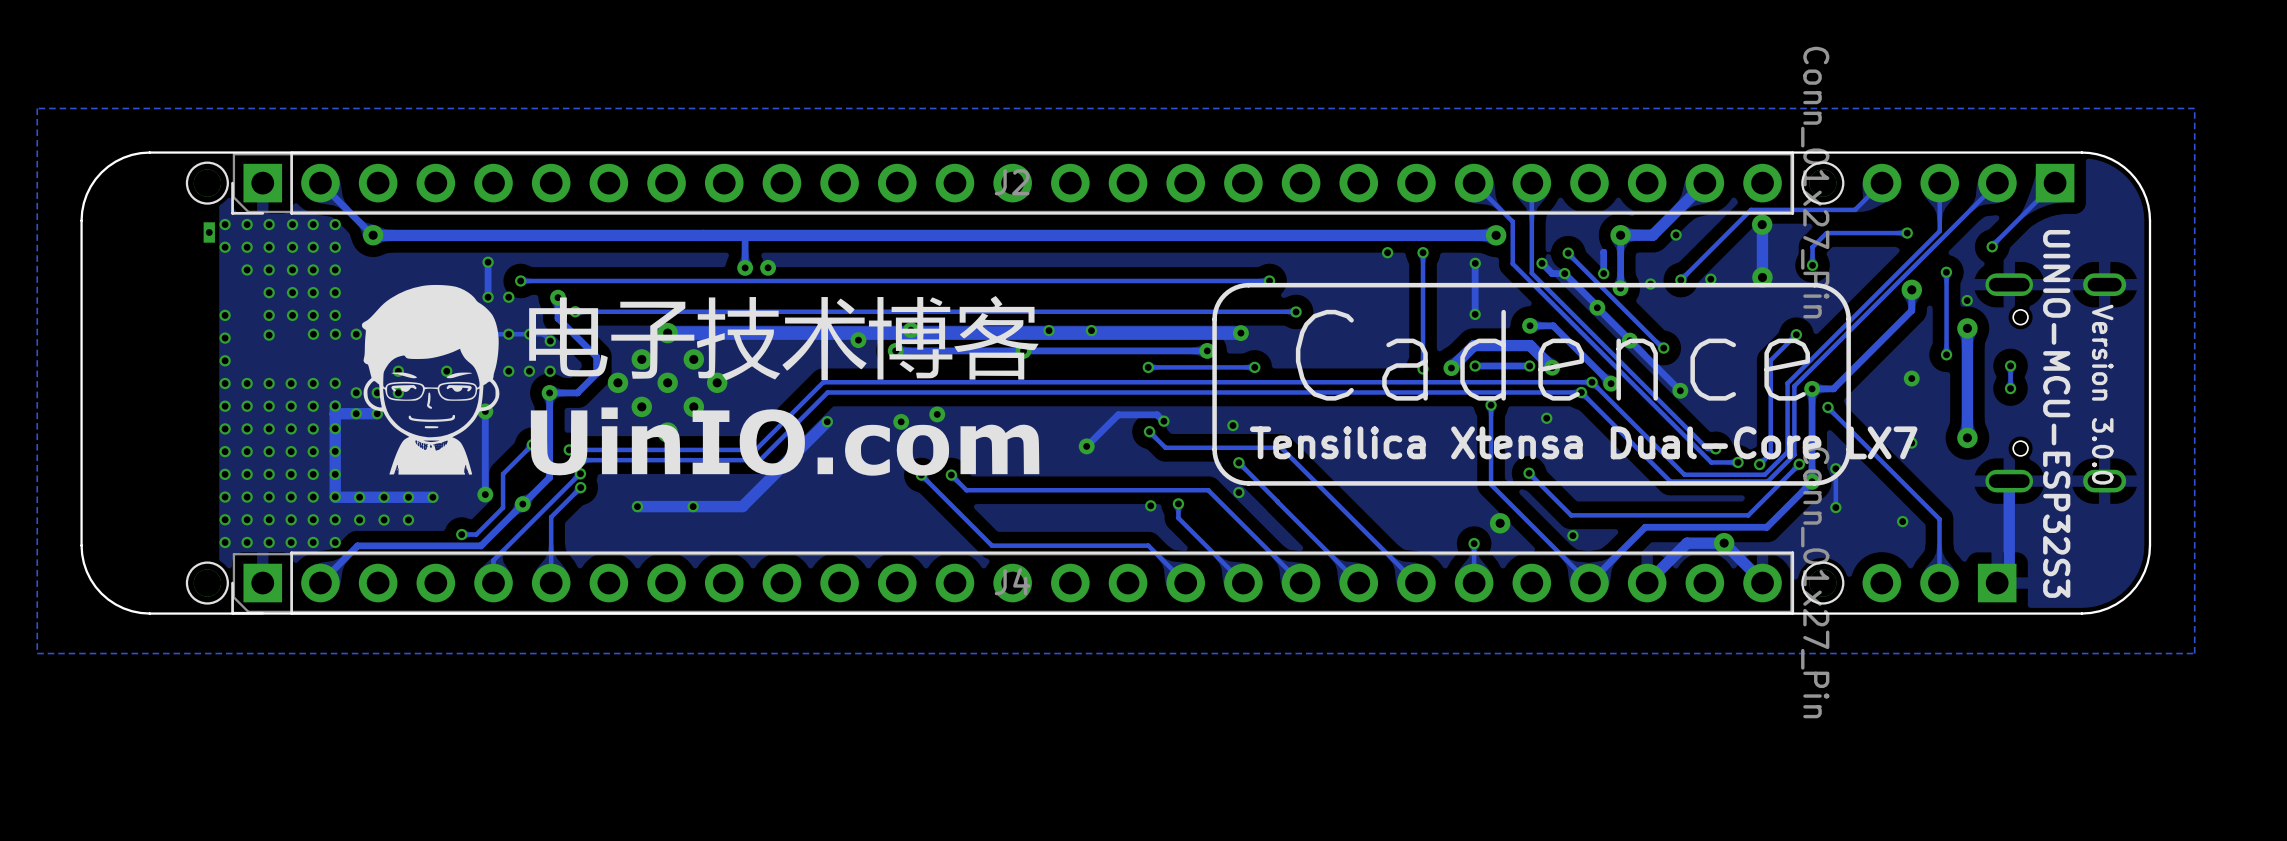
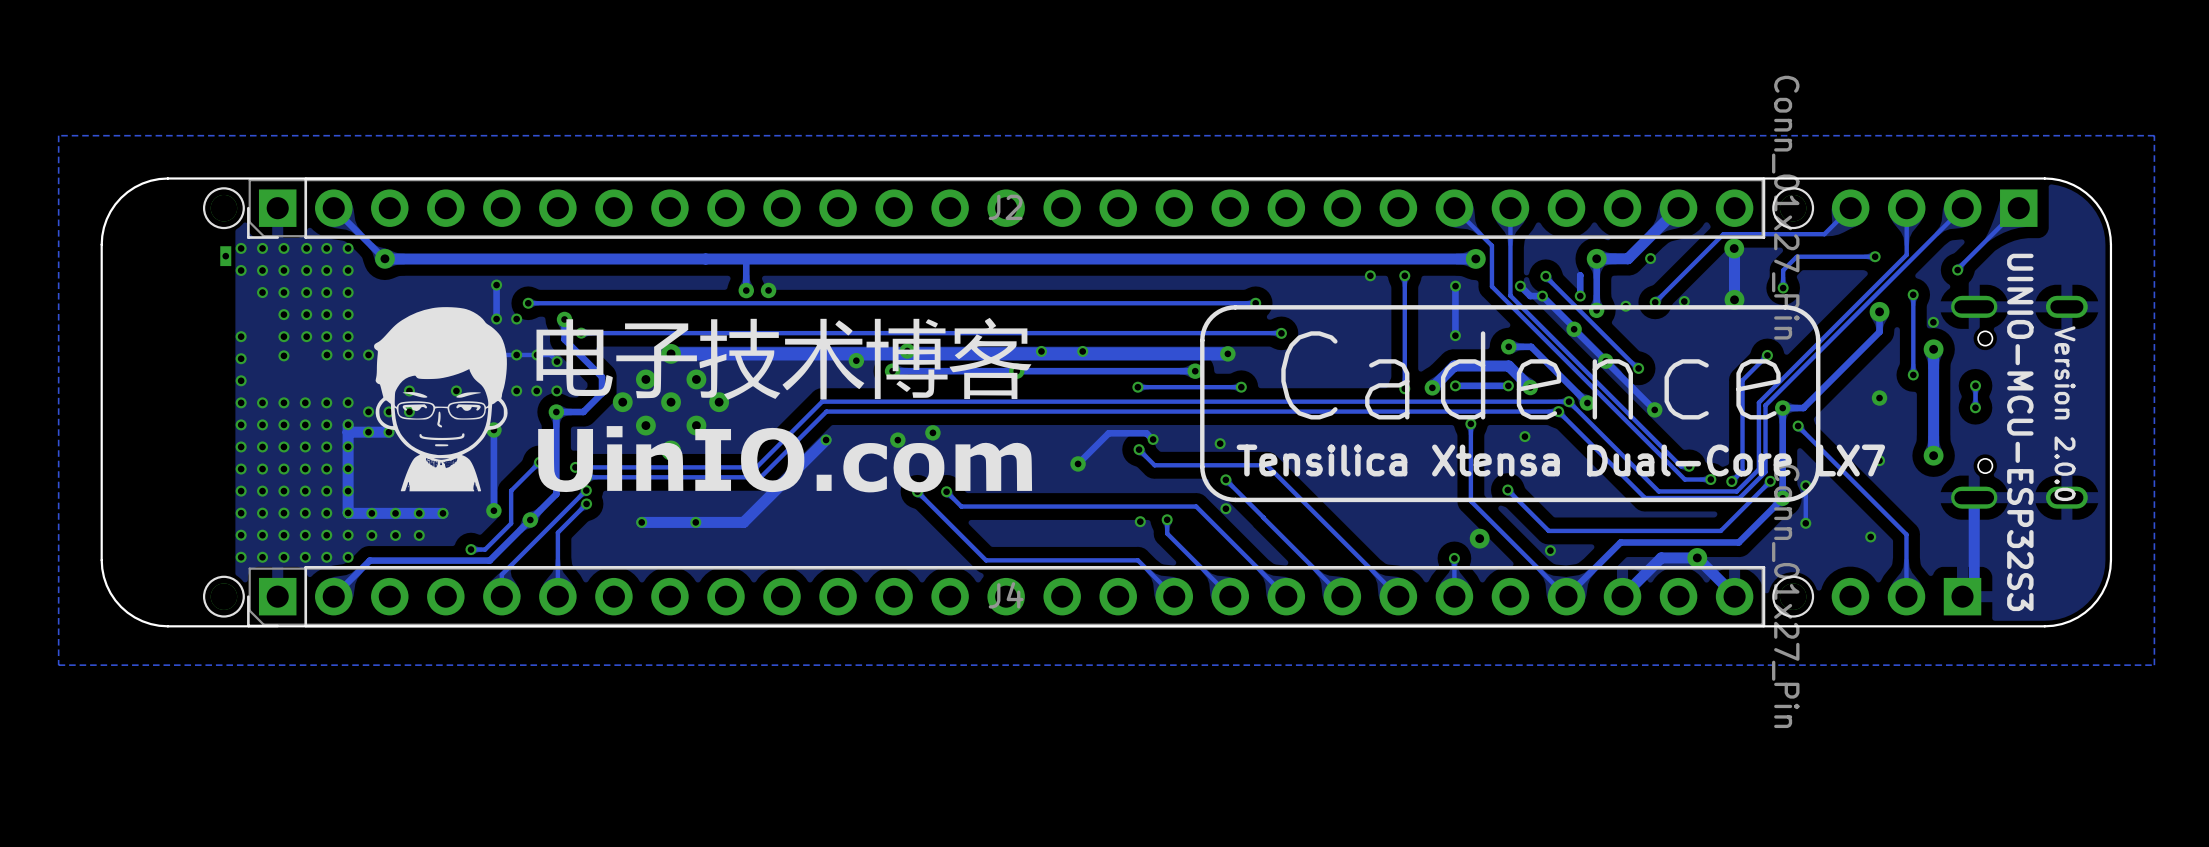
text: Version 3.0.0 (2102, 394) -> Version 2.0.0 (2065, 413)

